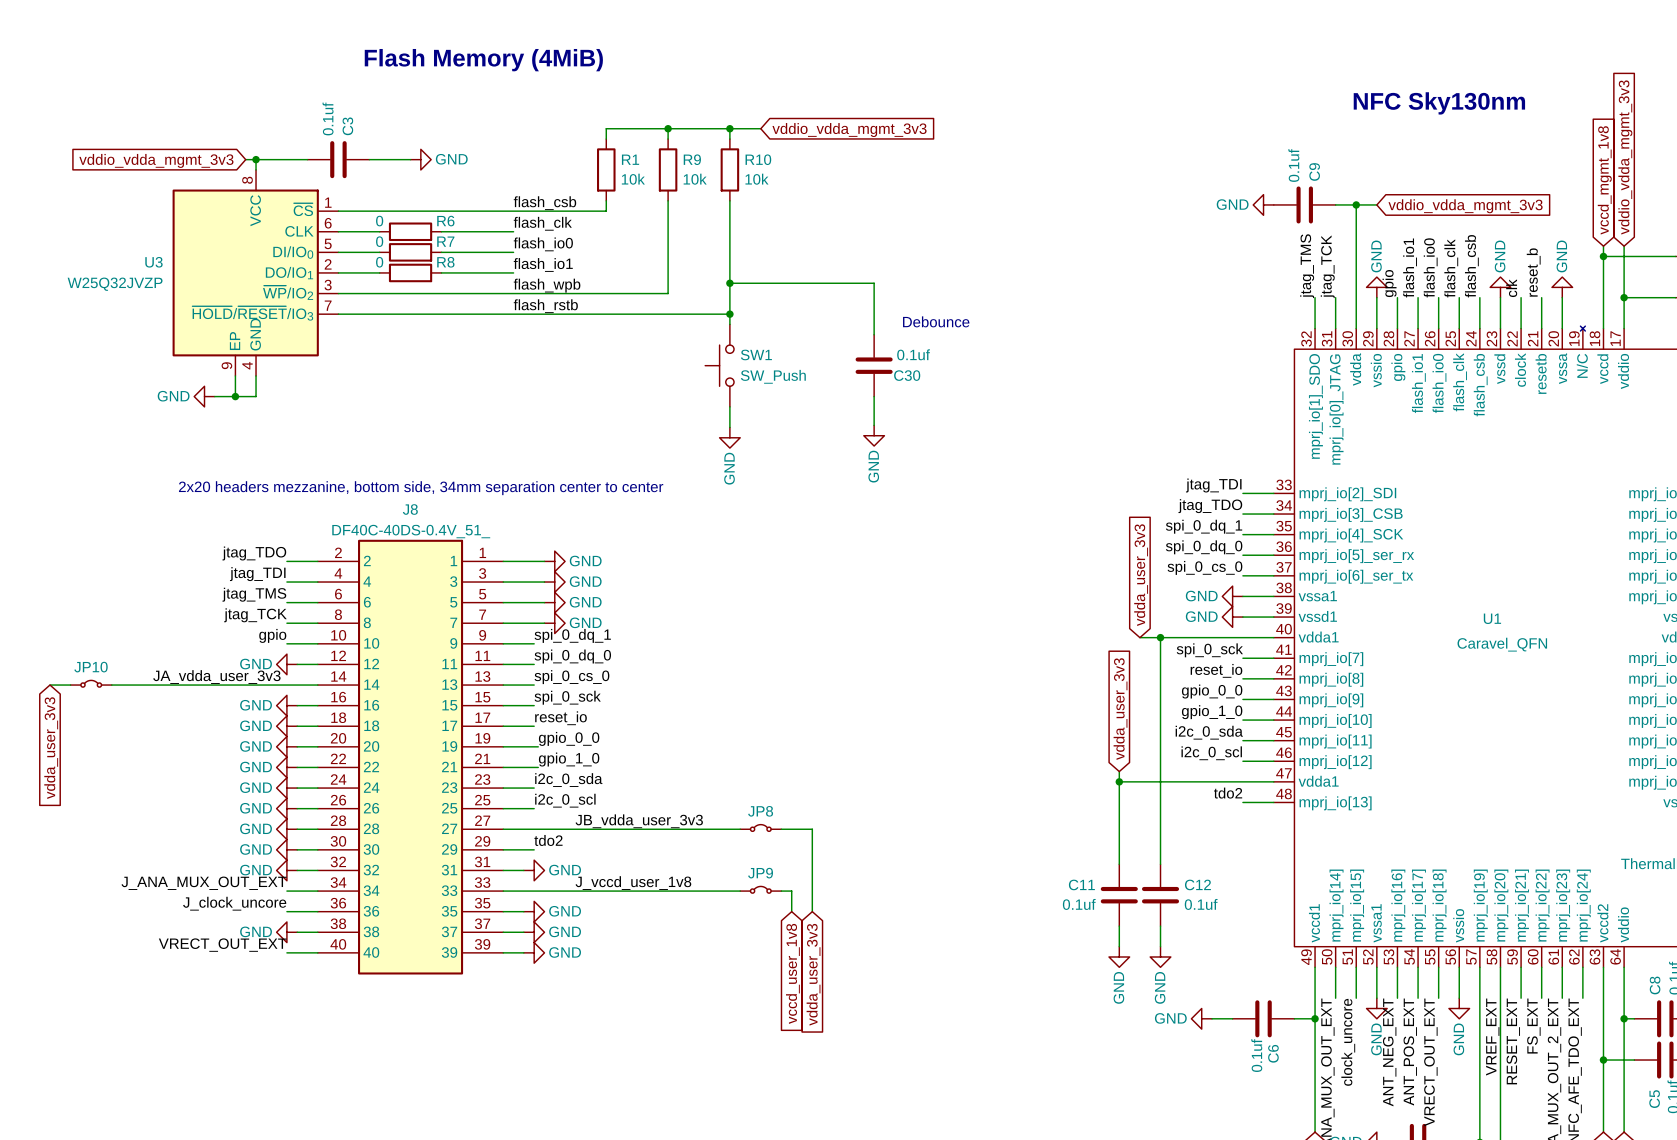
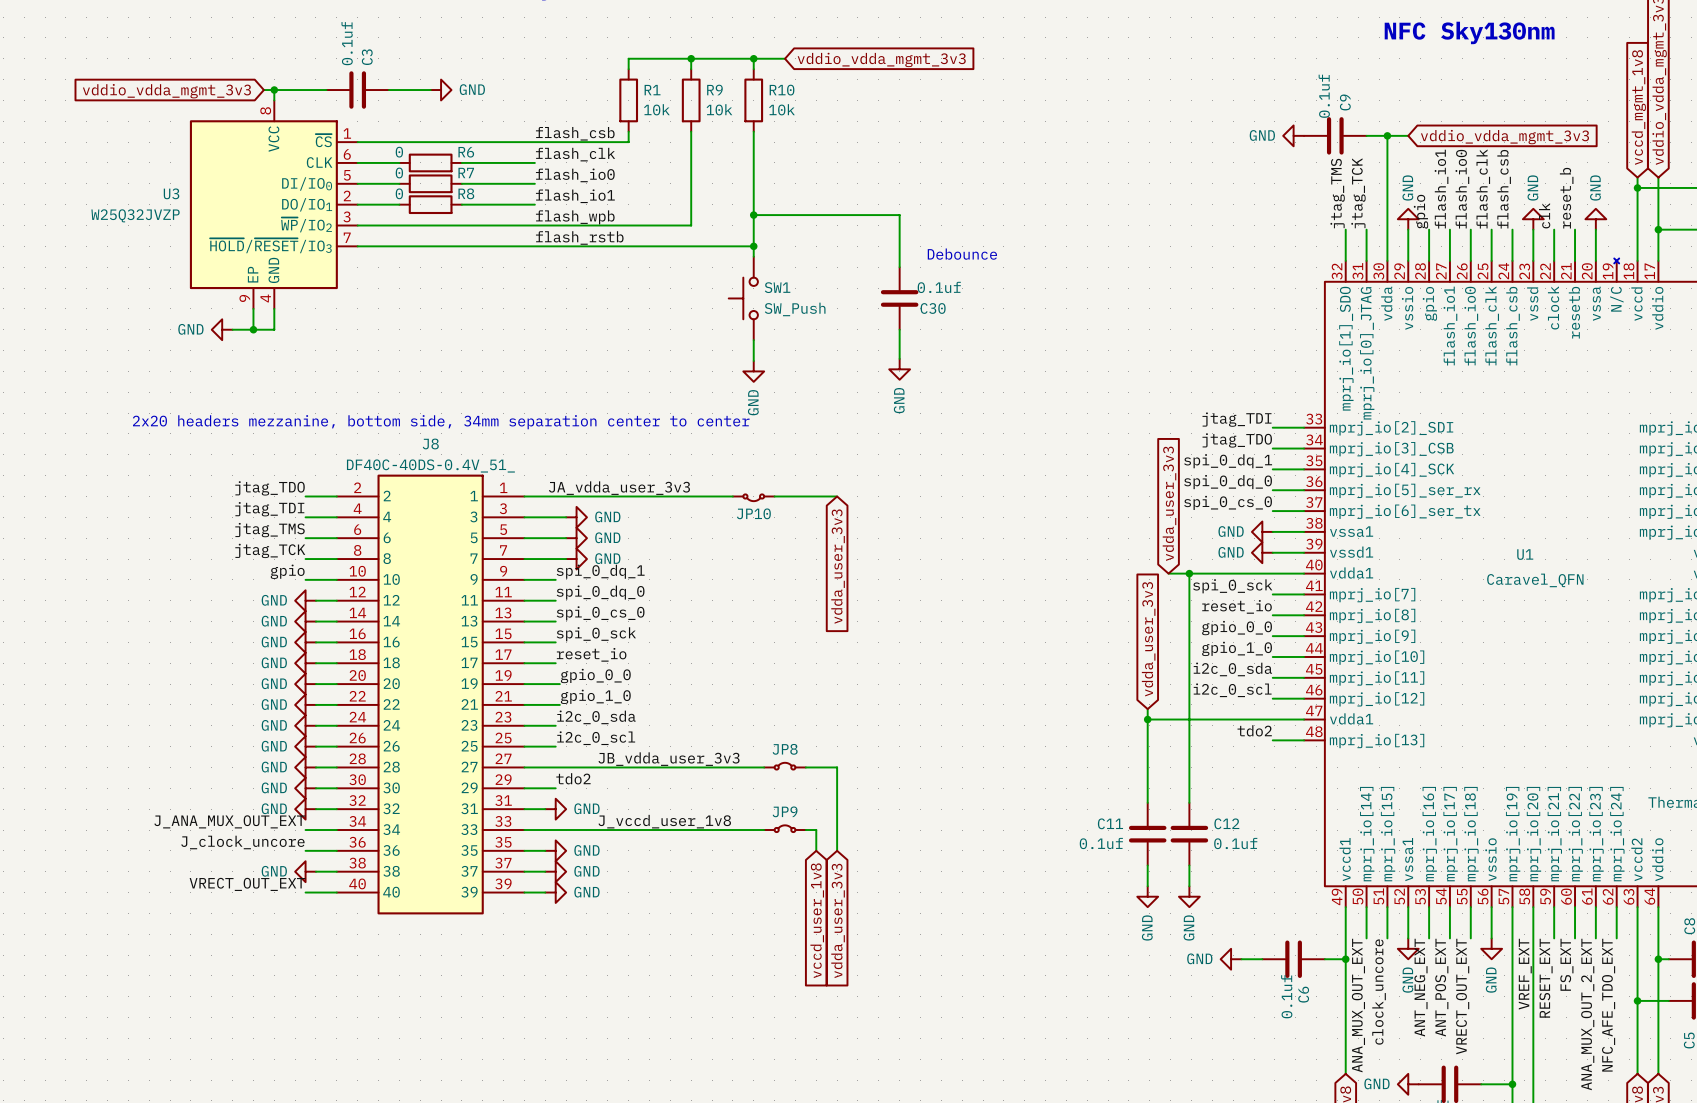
label: none -> JA_vdda_user_3v3 (619, 488)
wire: none -> (566, 496) (732, 496)
power symbol: GND (554, 561) -> none
wire: none -> (774, 496) (837, 496)
global label: none -> vdda_user_3v3 (838, 566)
label: JA_vdda_user_3v3 (216, 677) -> none
JP10 rotation: 0° (91, 683) -> 180° (753, 497)
JP10 position: (91, 683) -> (753, 497)
wire: (49, 685) (70, 685) -> none
wire: (111, 685) (297, 685) -> none
power symbol: none -> GND (305, 621)
global label: vdda_user_3v3 (51, 748) -> none

